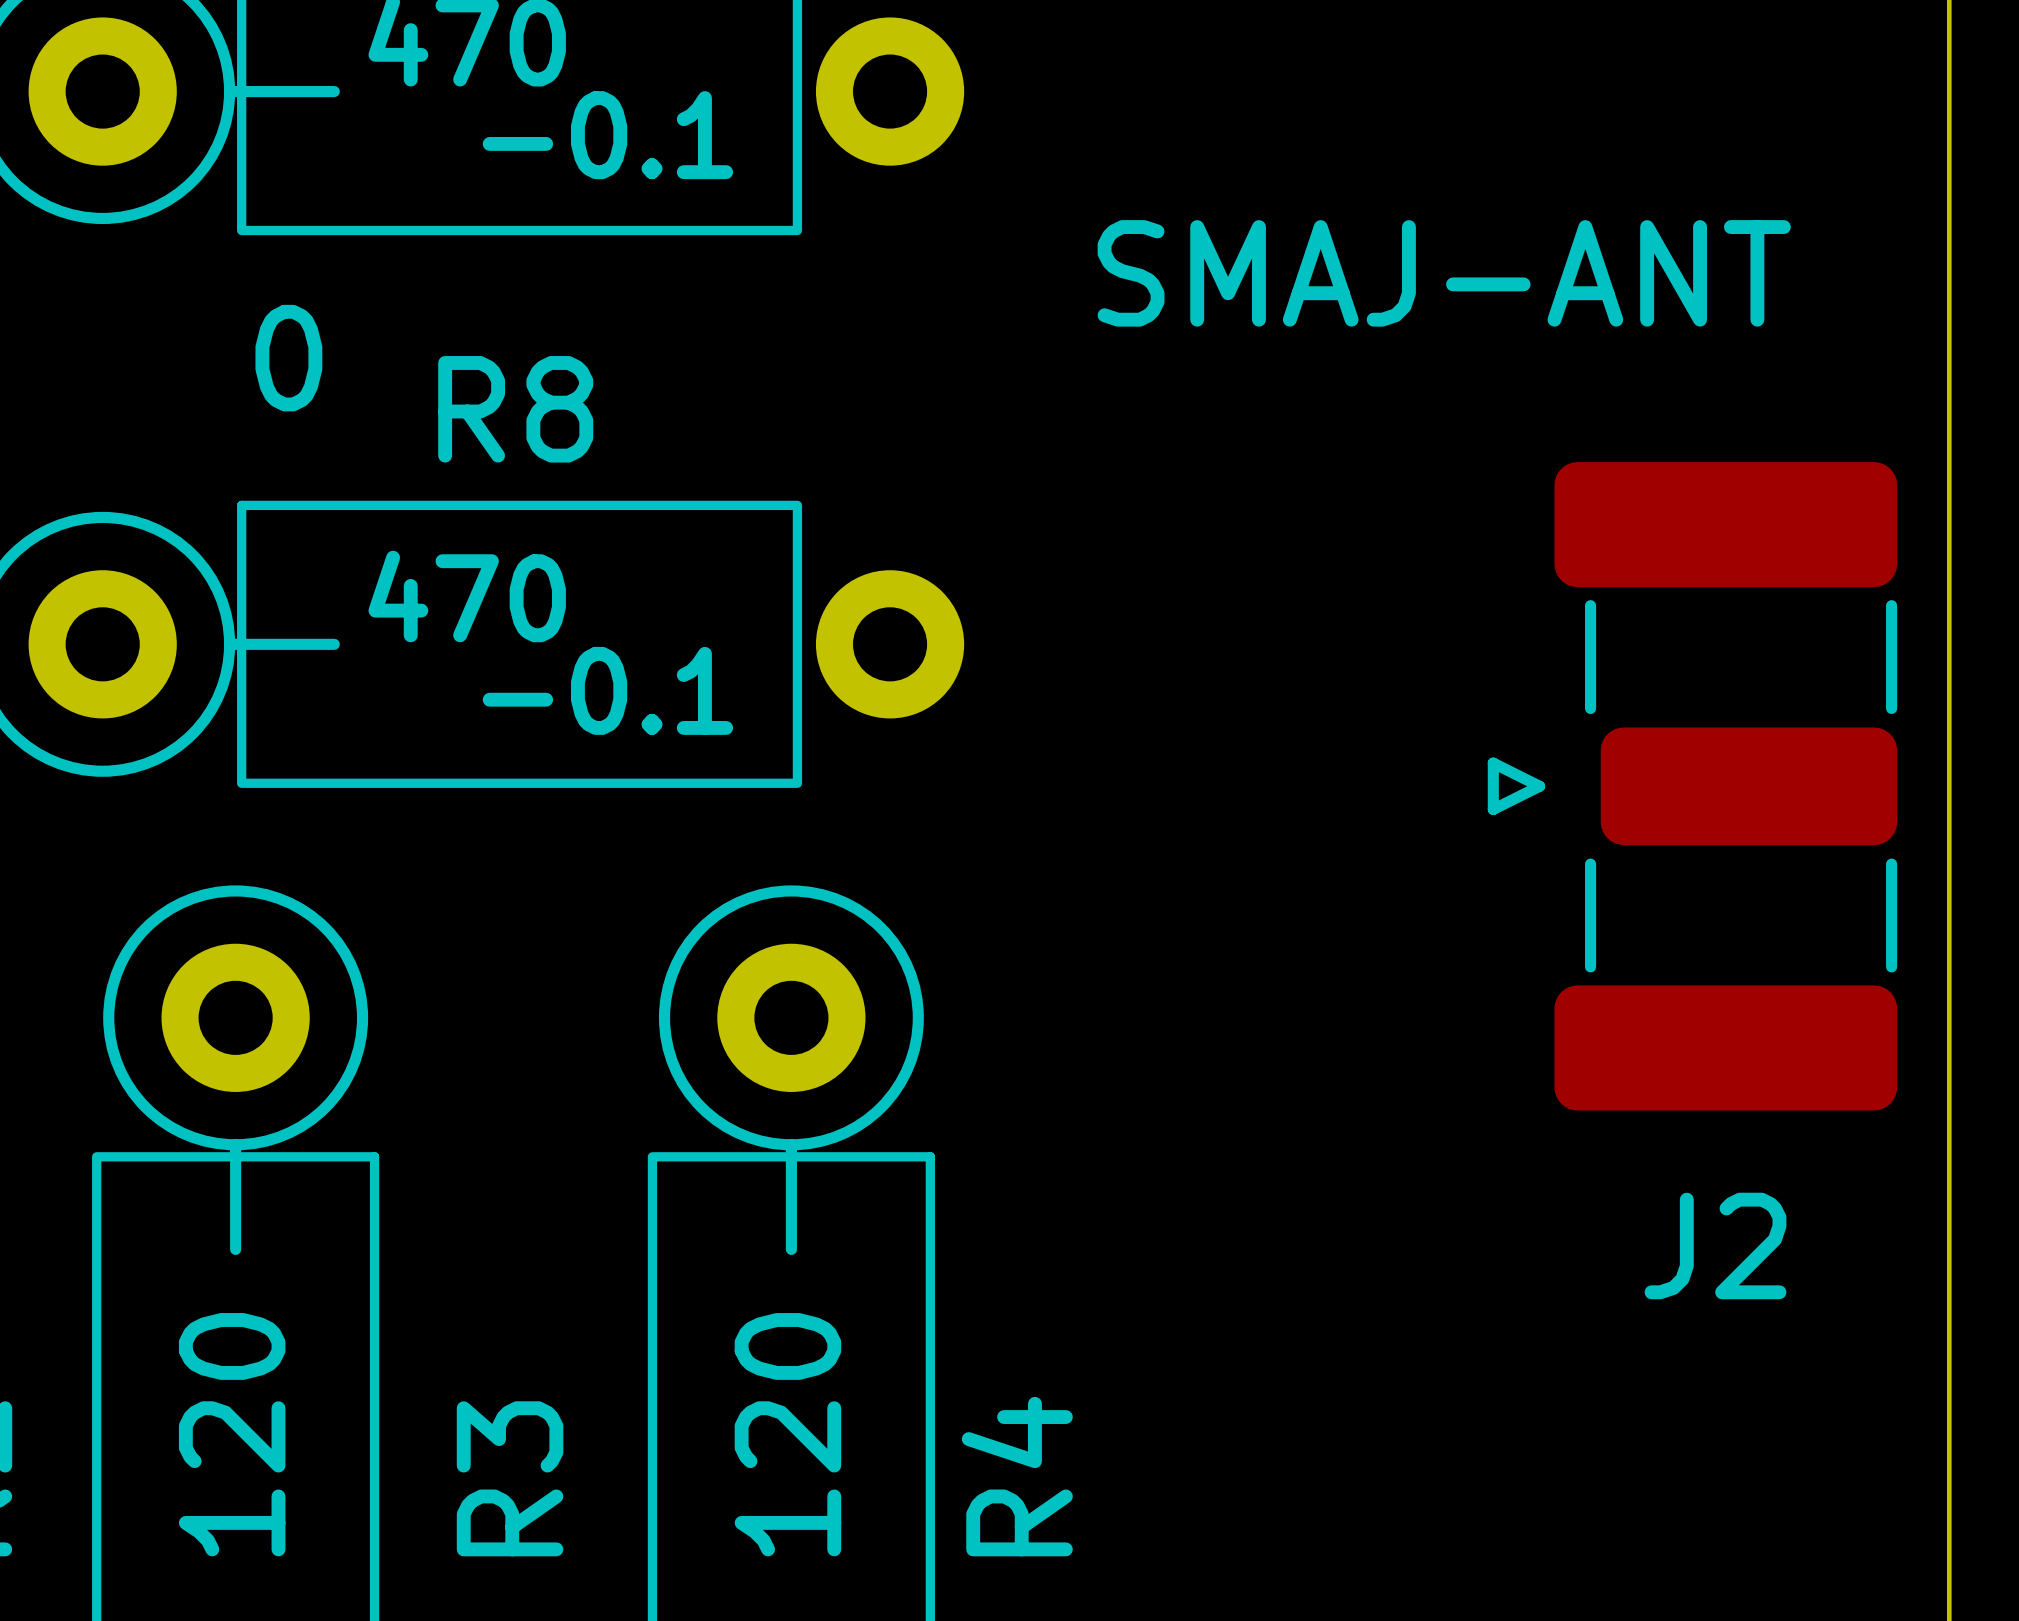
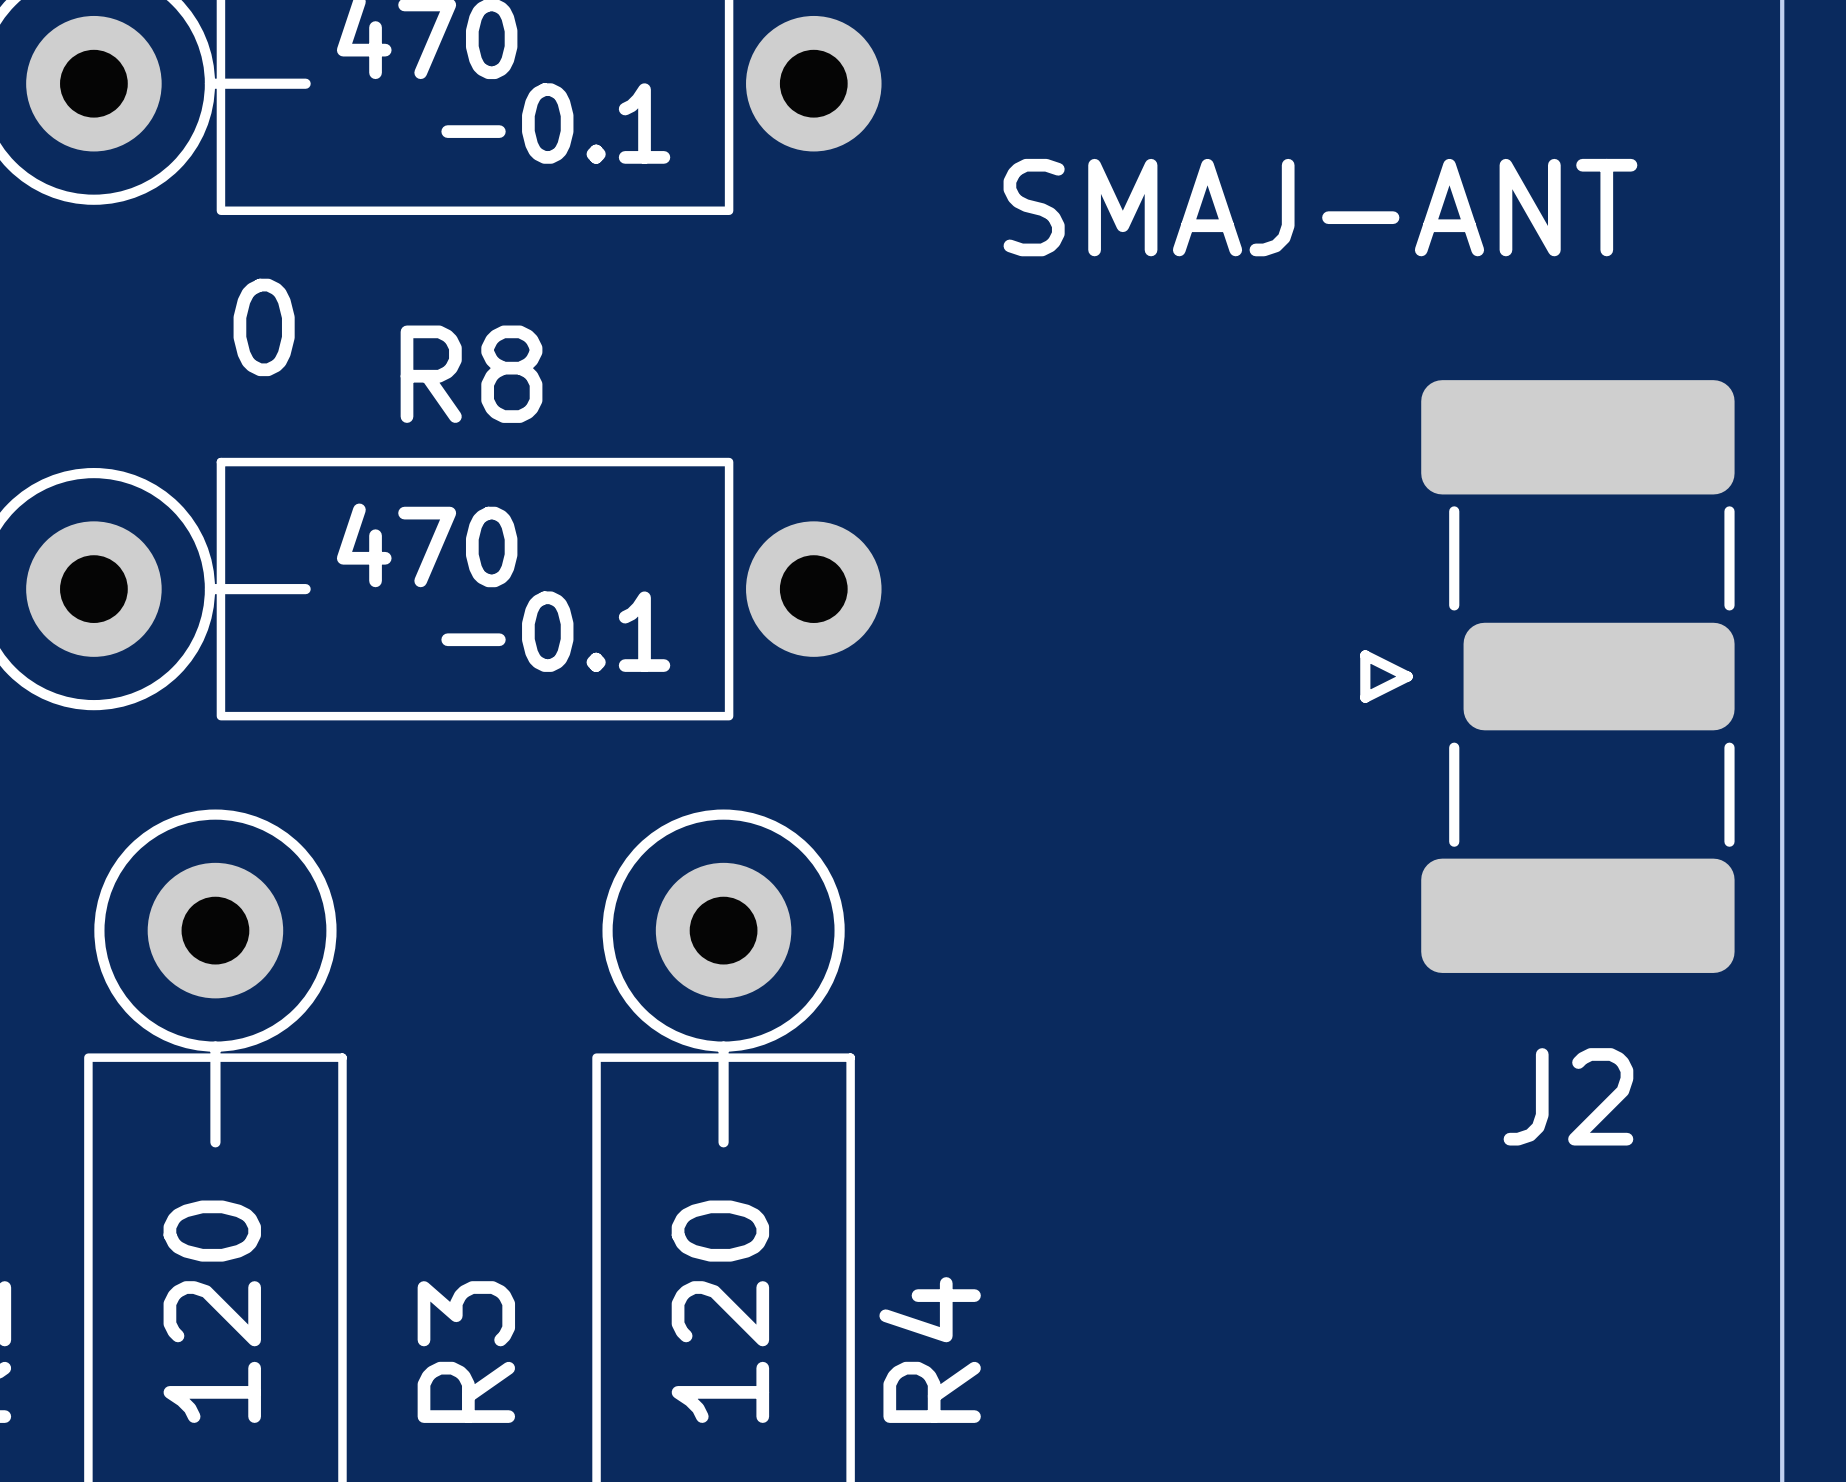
J2 position: (1692, 786) -> (1547, 676)

